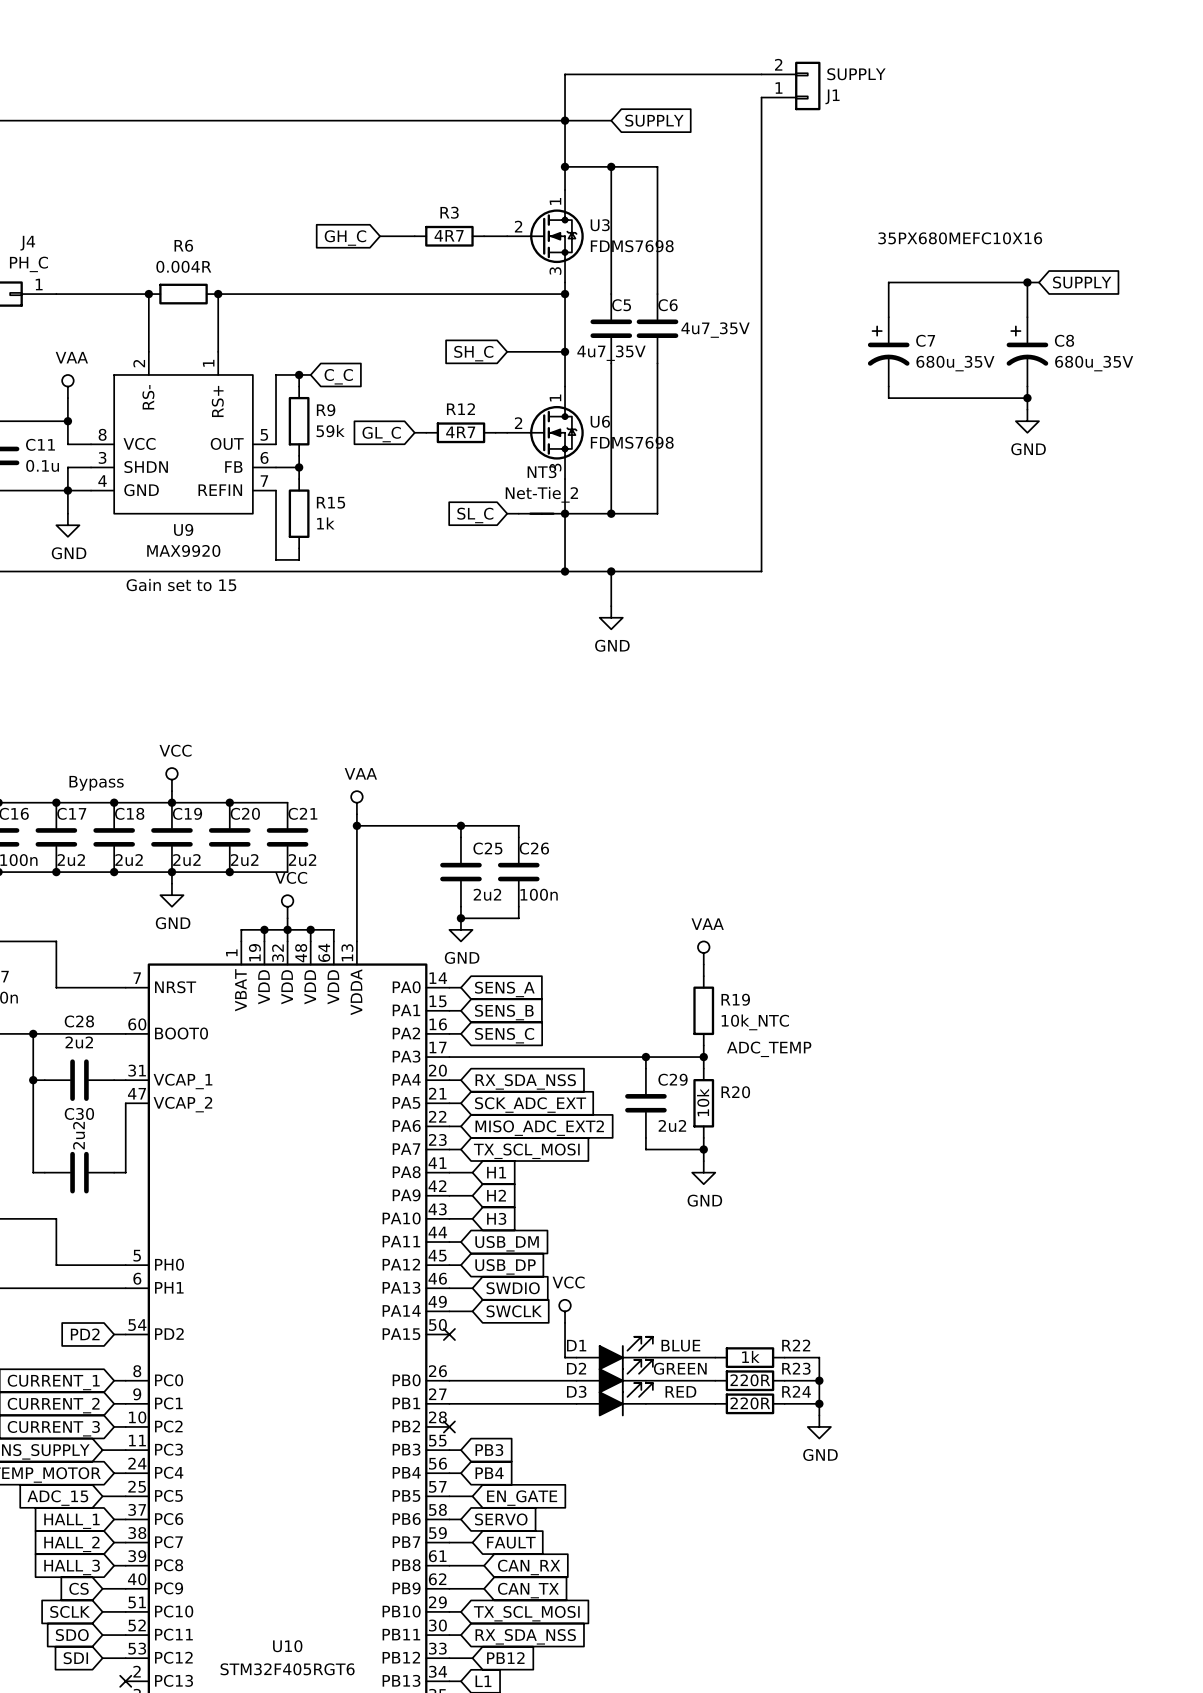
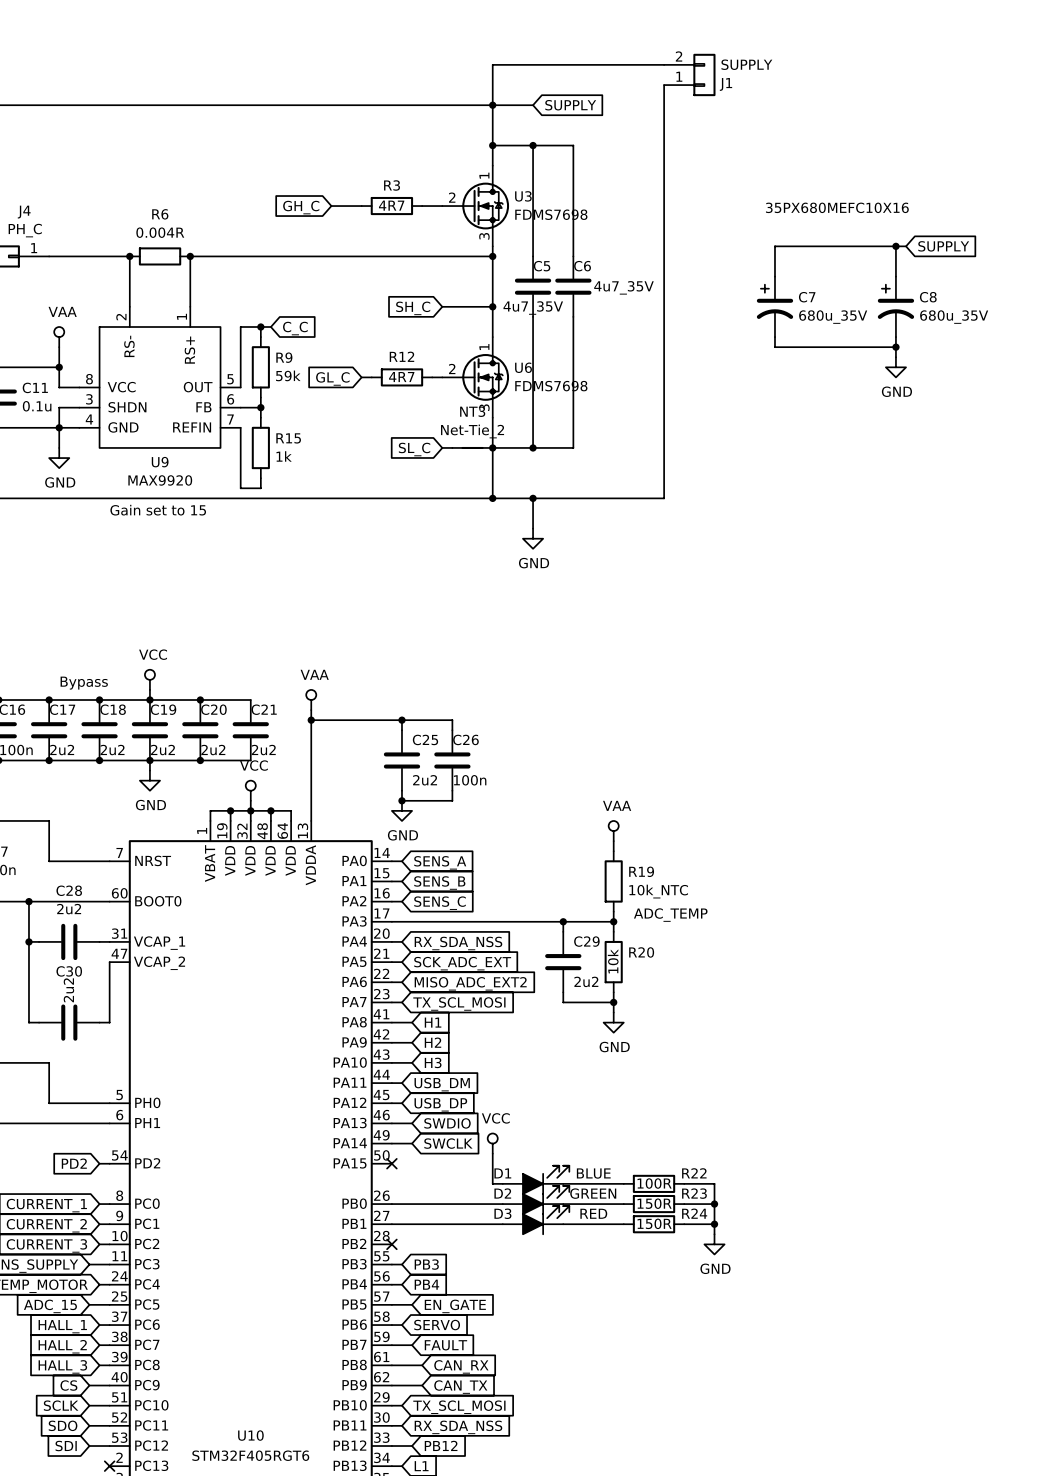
R22 value: 1k (750, 1356) -> 100R (654, 1183)
R23 value: 220R (750, 1380) -> 150R (654, 1203)
R24 value: 220R (750, 1403) -> 150R (654, 1223)

